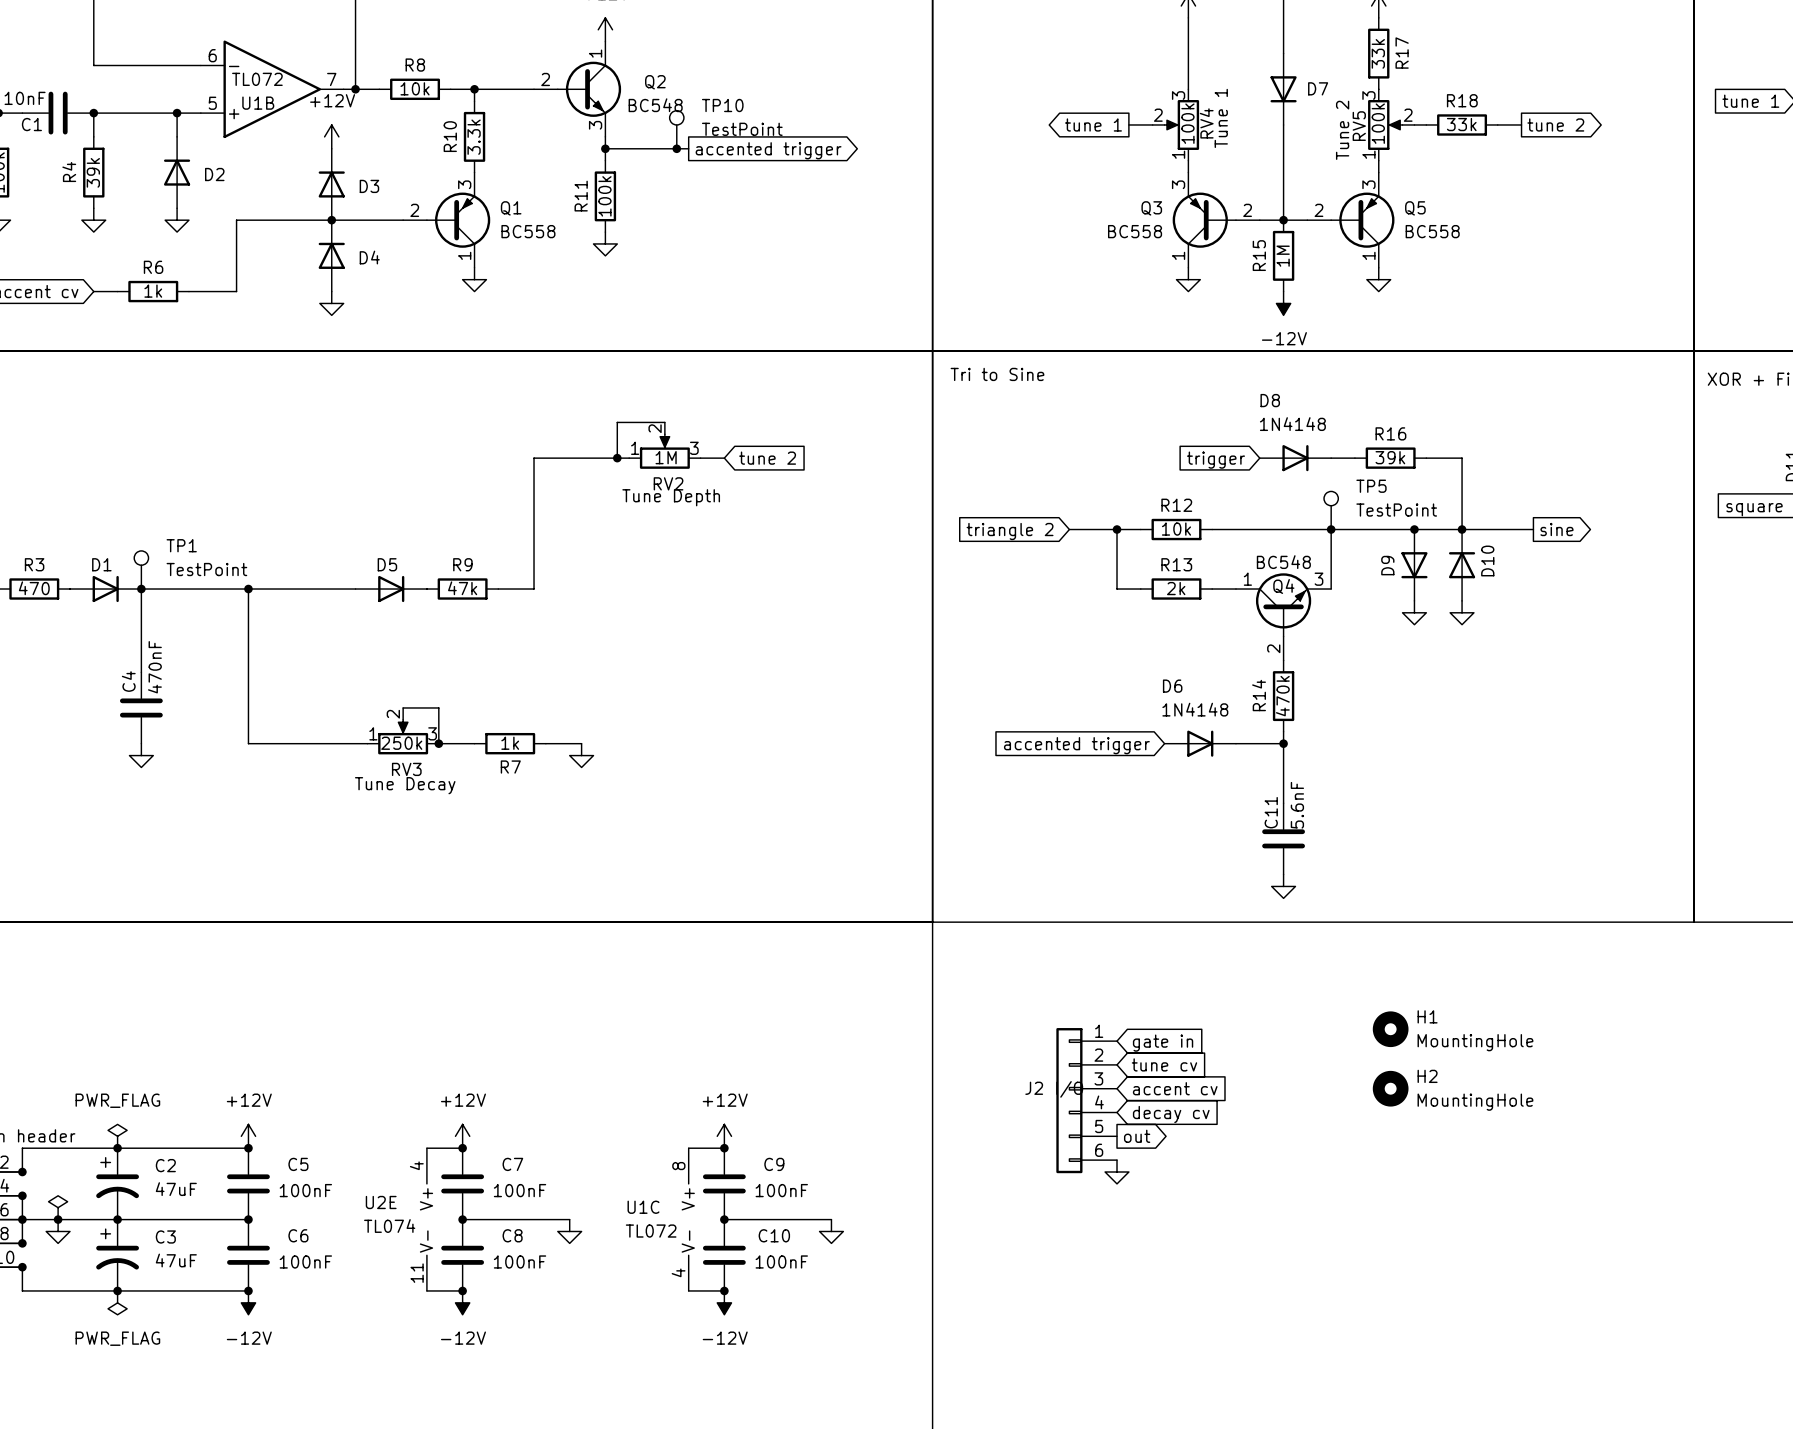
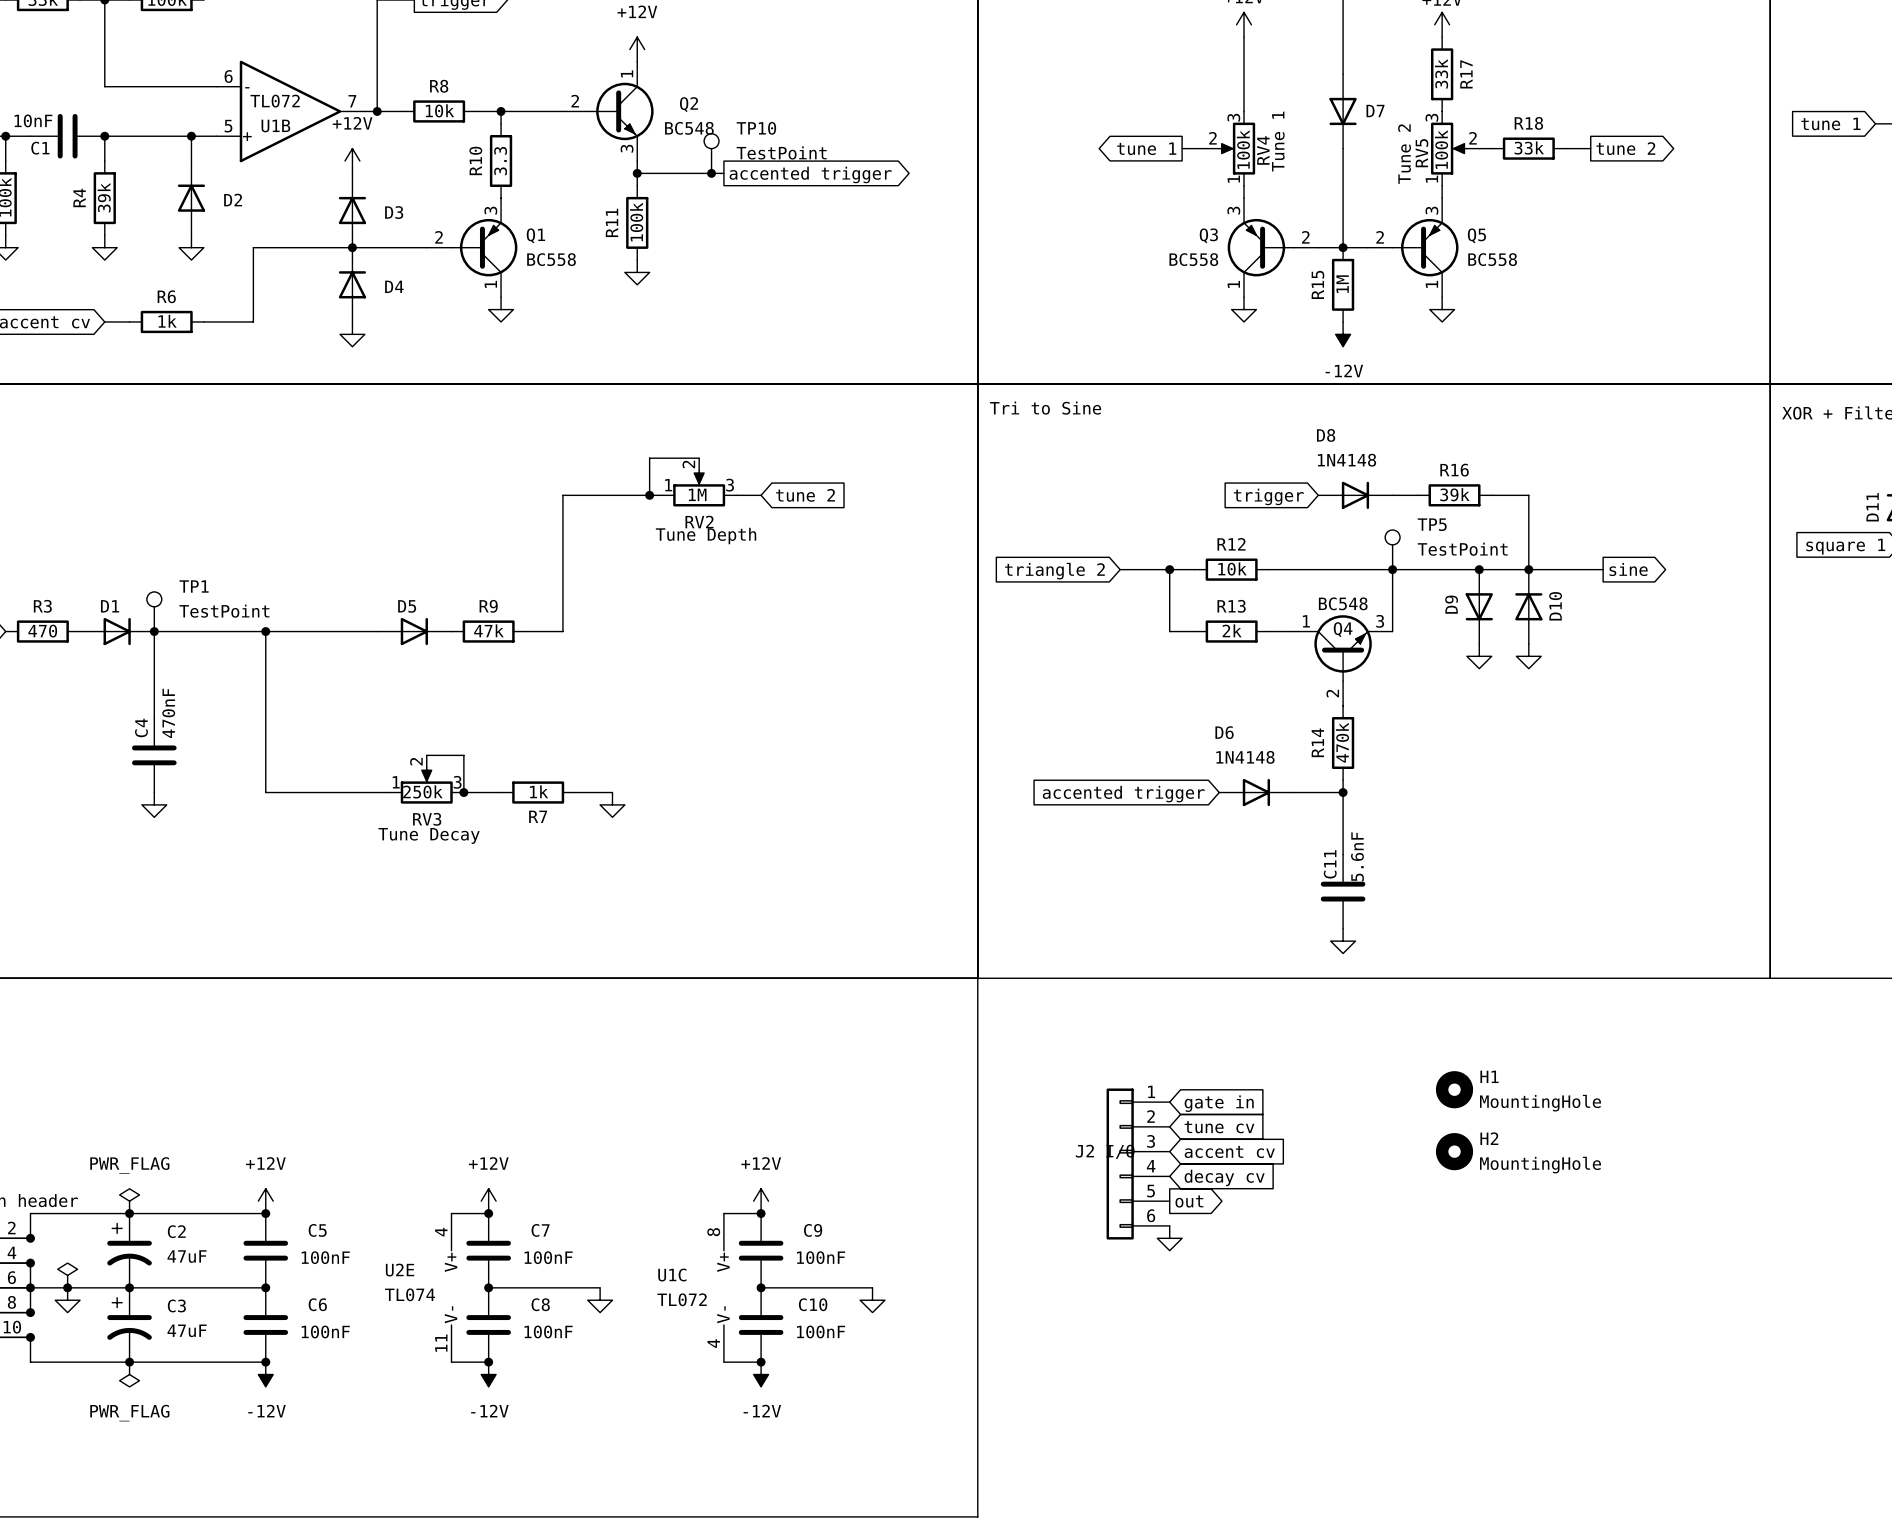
R10 value: 3.3k (474, 137) -> 3.3 (500, 161)

